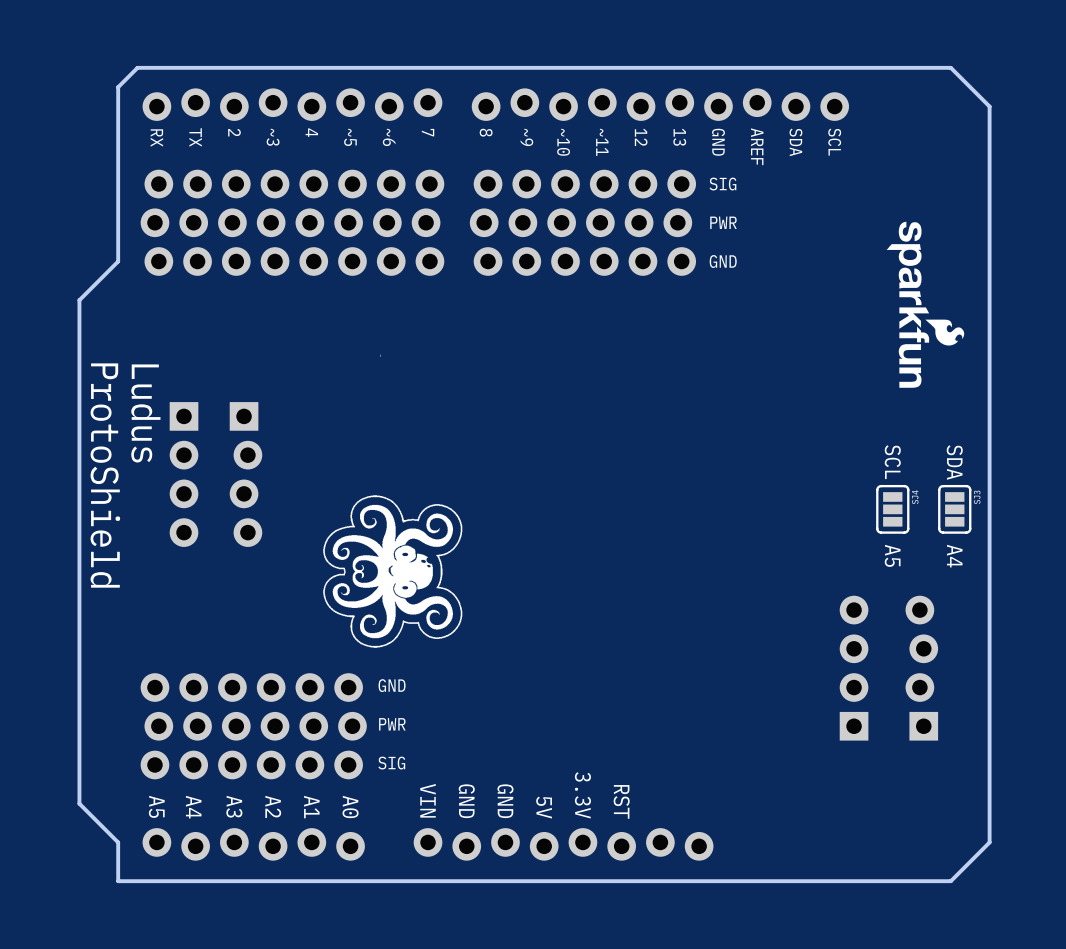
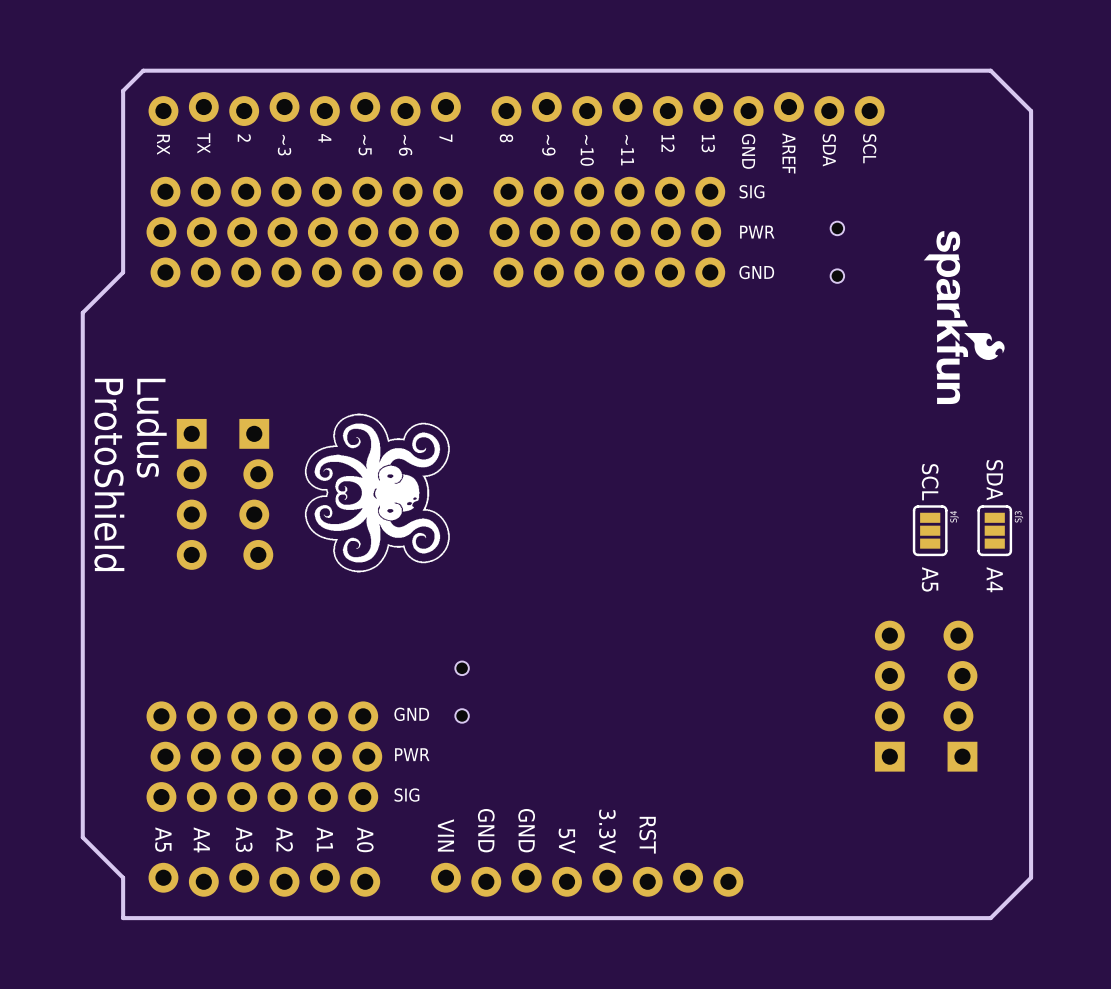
part: none -> (837, 252)
drawing: [323, 354, 463, 648] -> none
drawing: none -> [304, 413, 450, 573]
part: none -> (462, 692)

